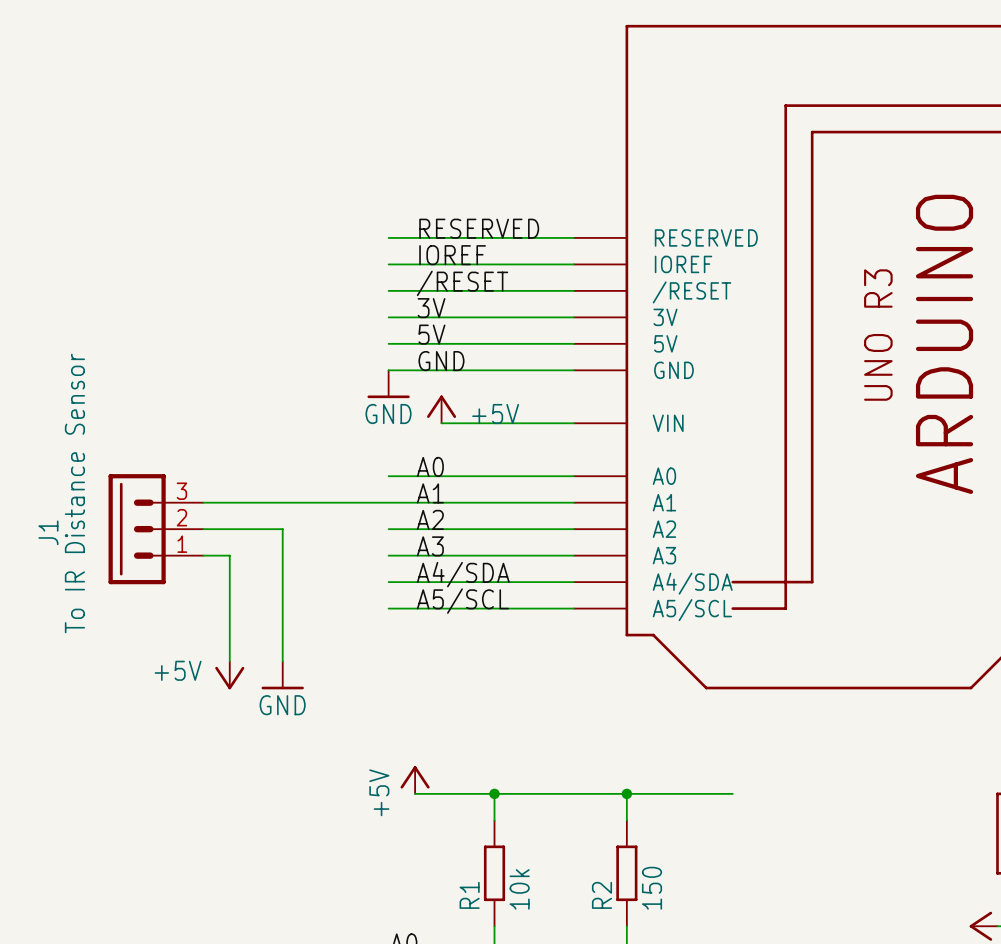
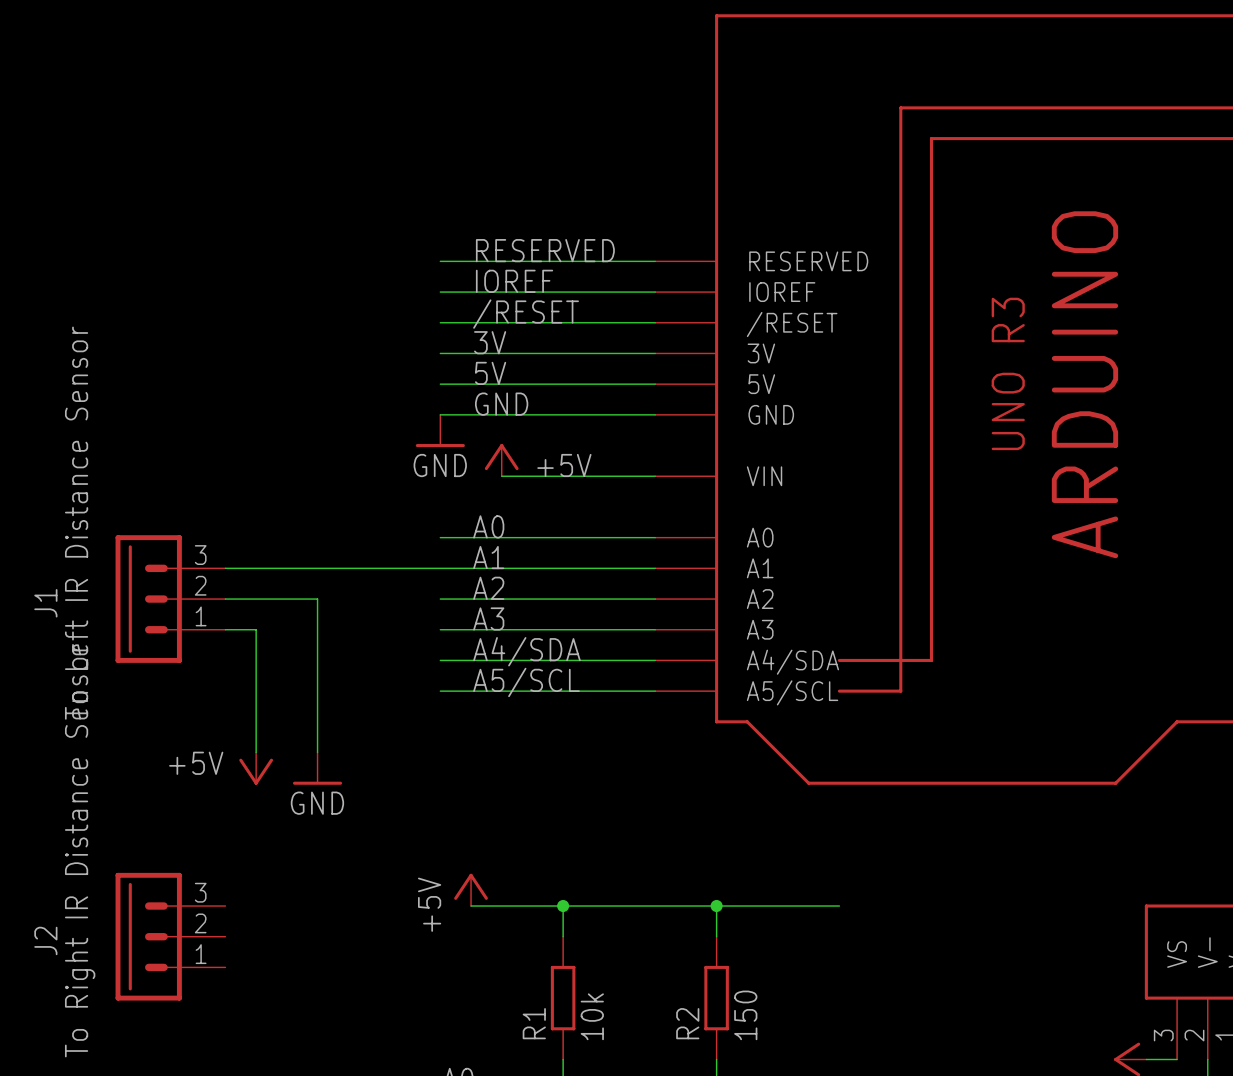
J1 value: To IR Distance Sensor (74, 493) -> To Left IR Distance Sensor (76, 523)
J2: none -> To Right IR Distance Sensor (170, 936)

